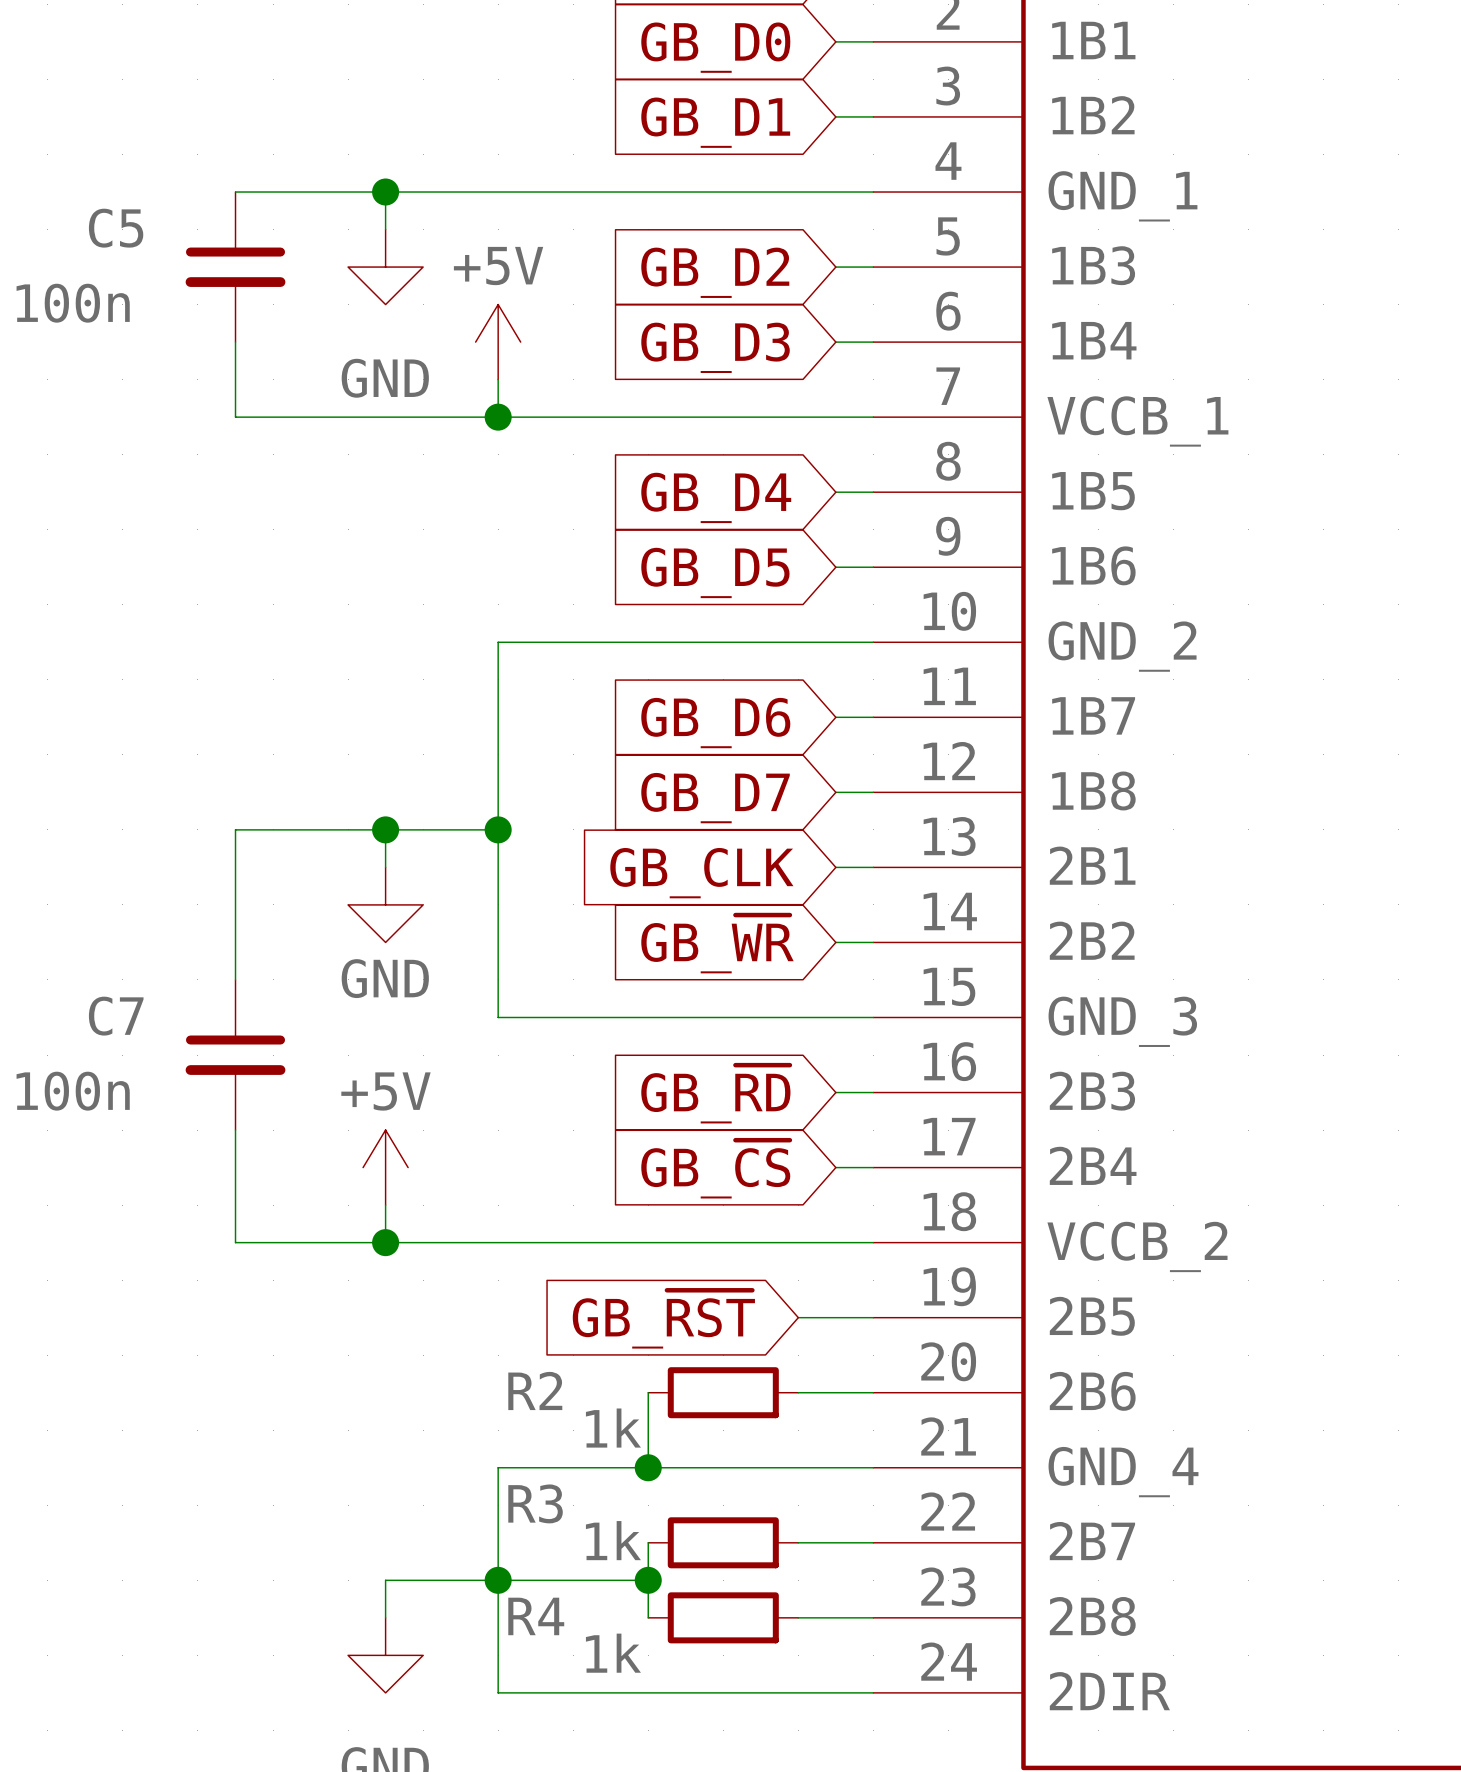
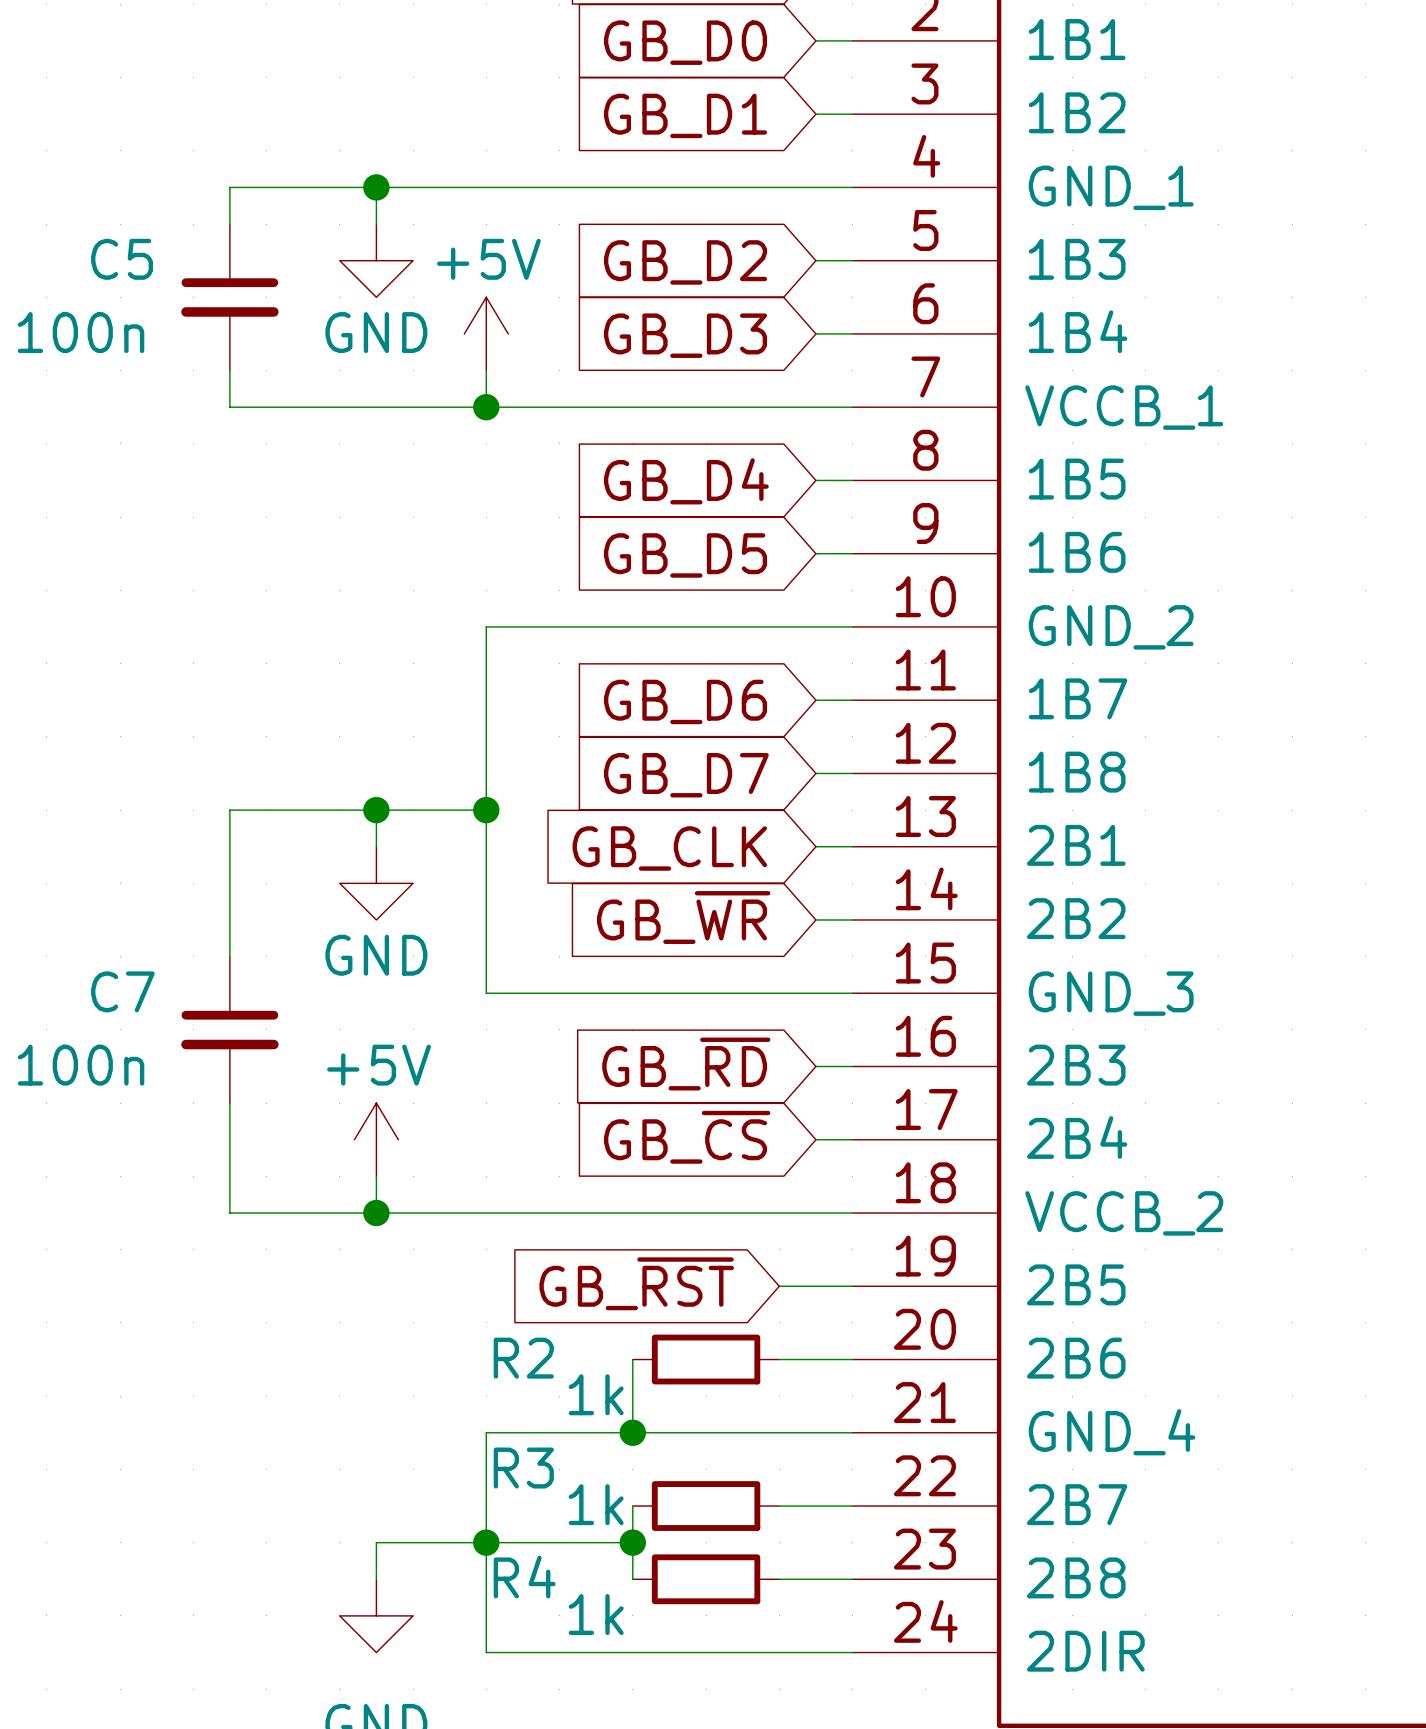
C5 position: (235, 267) -> (229, 297)
power symbol text position: GND (385, 378) -> GND (376, 332)

